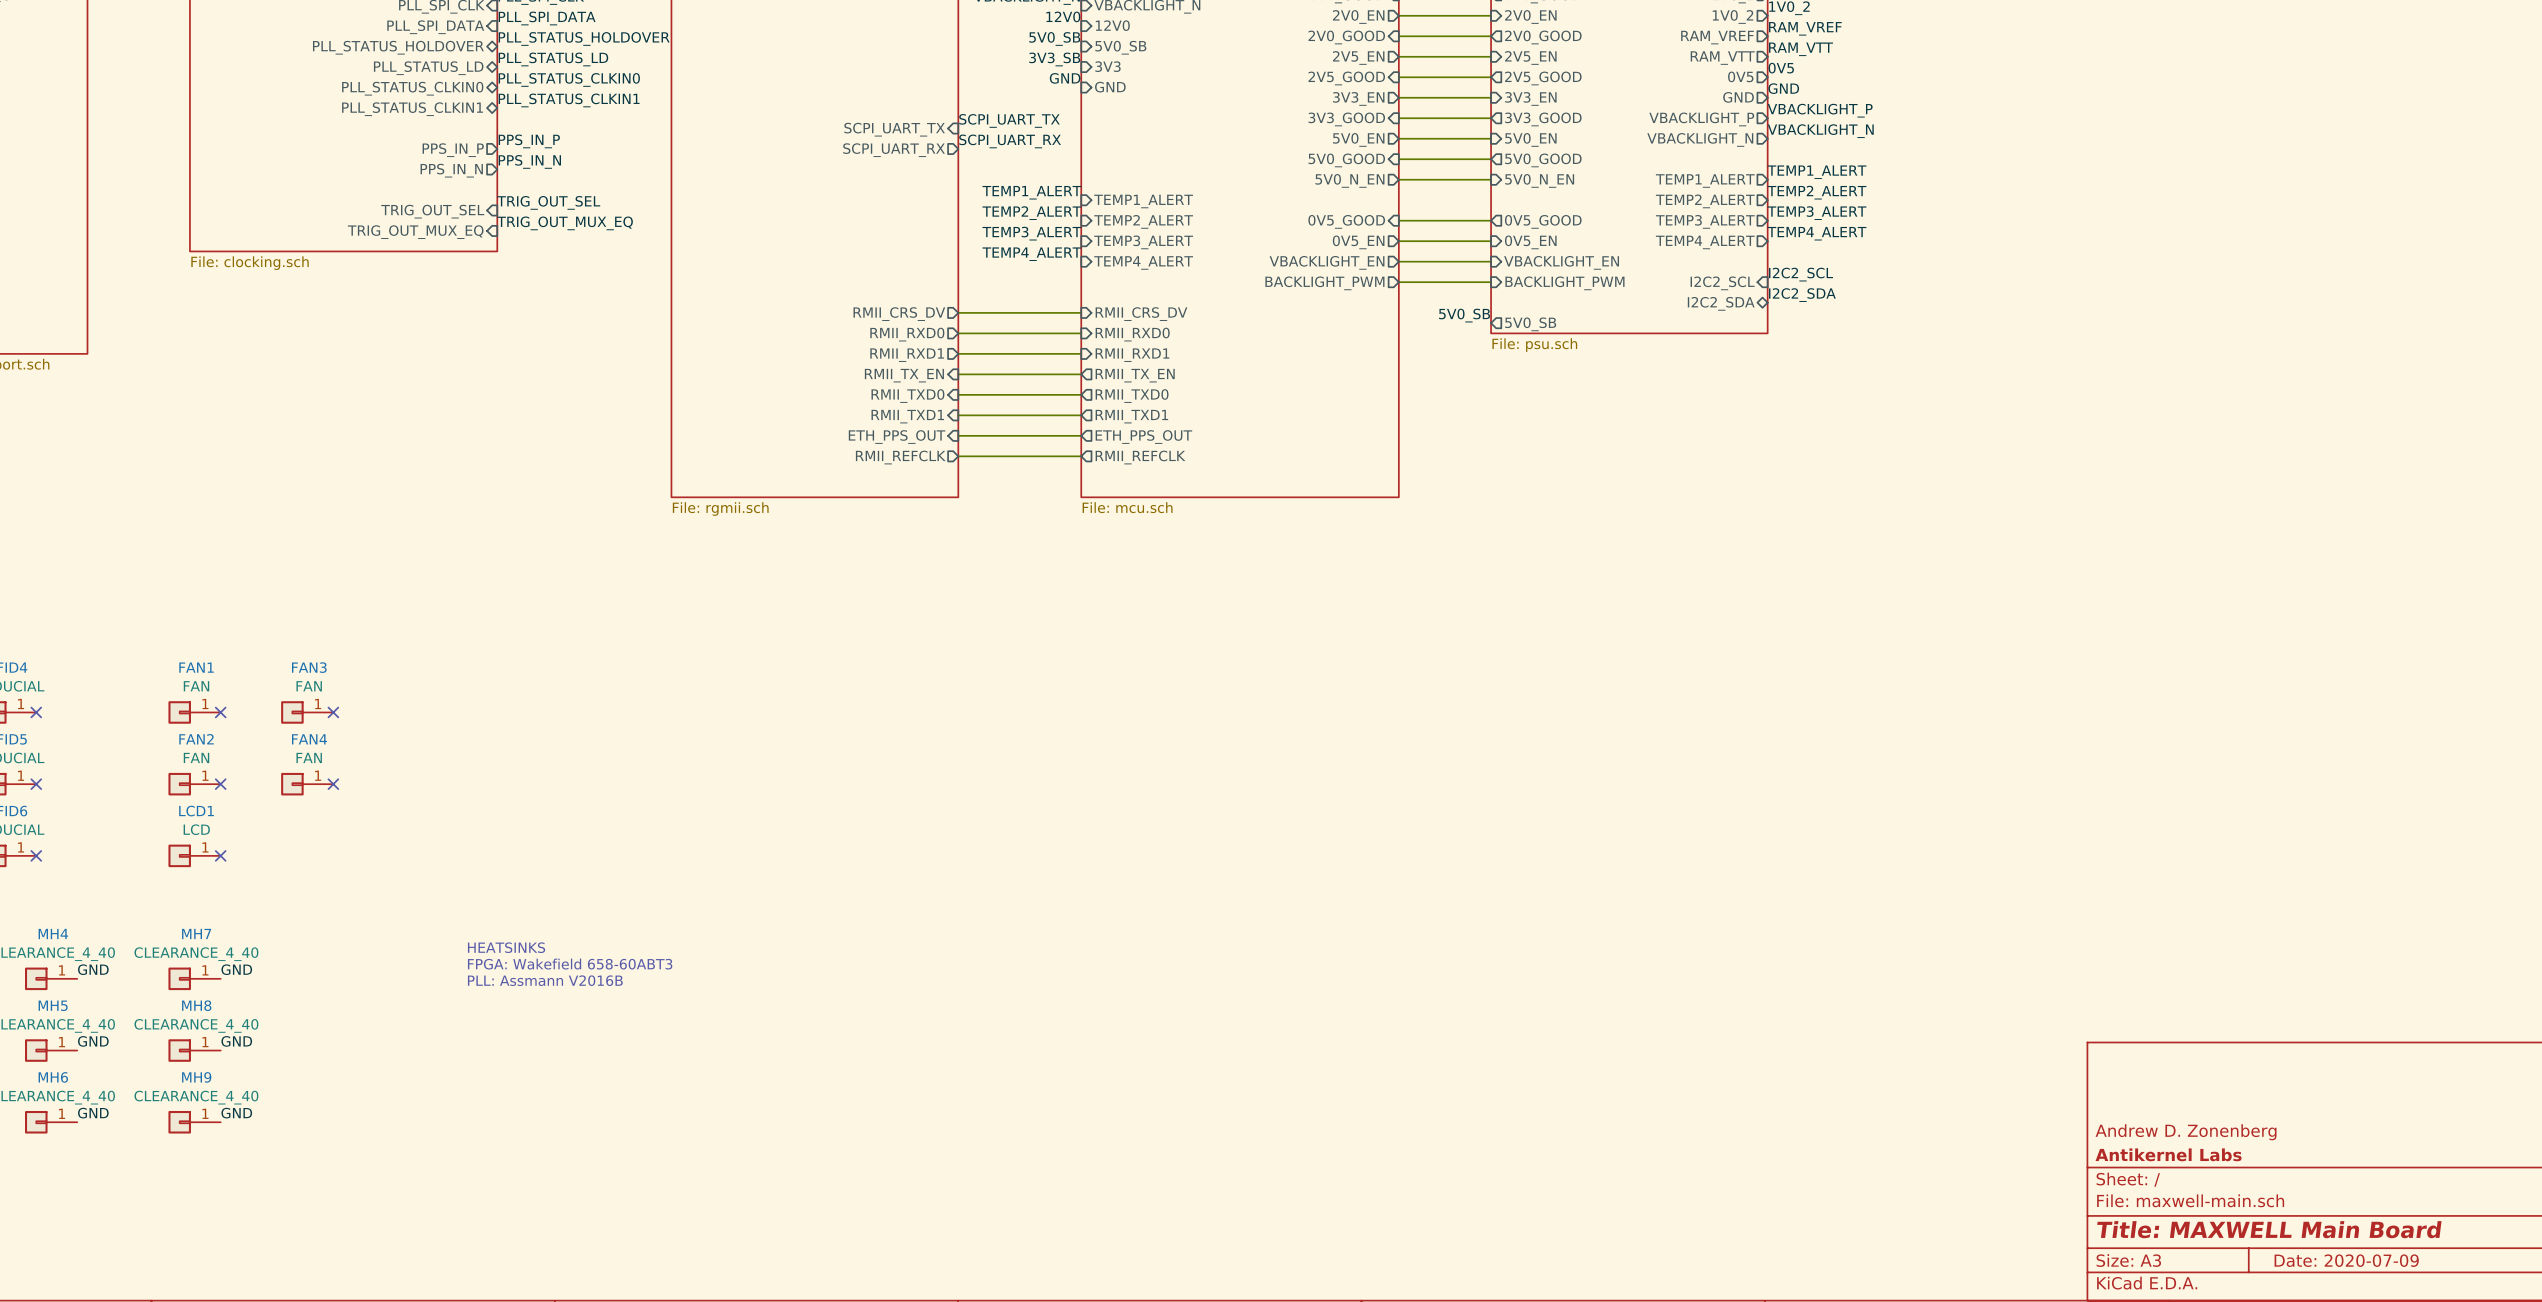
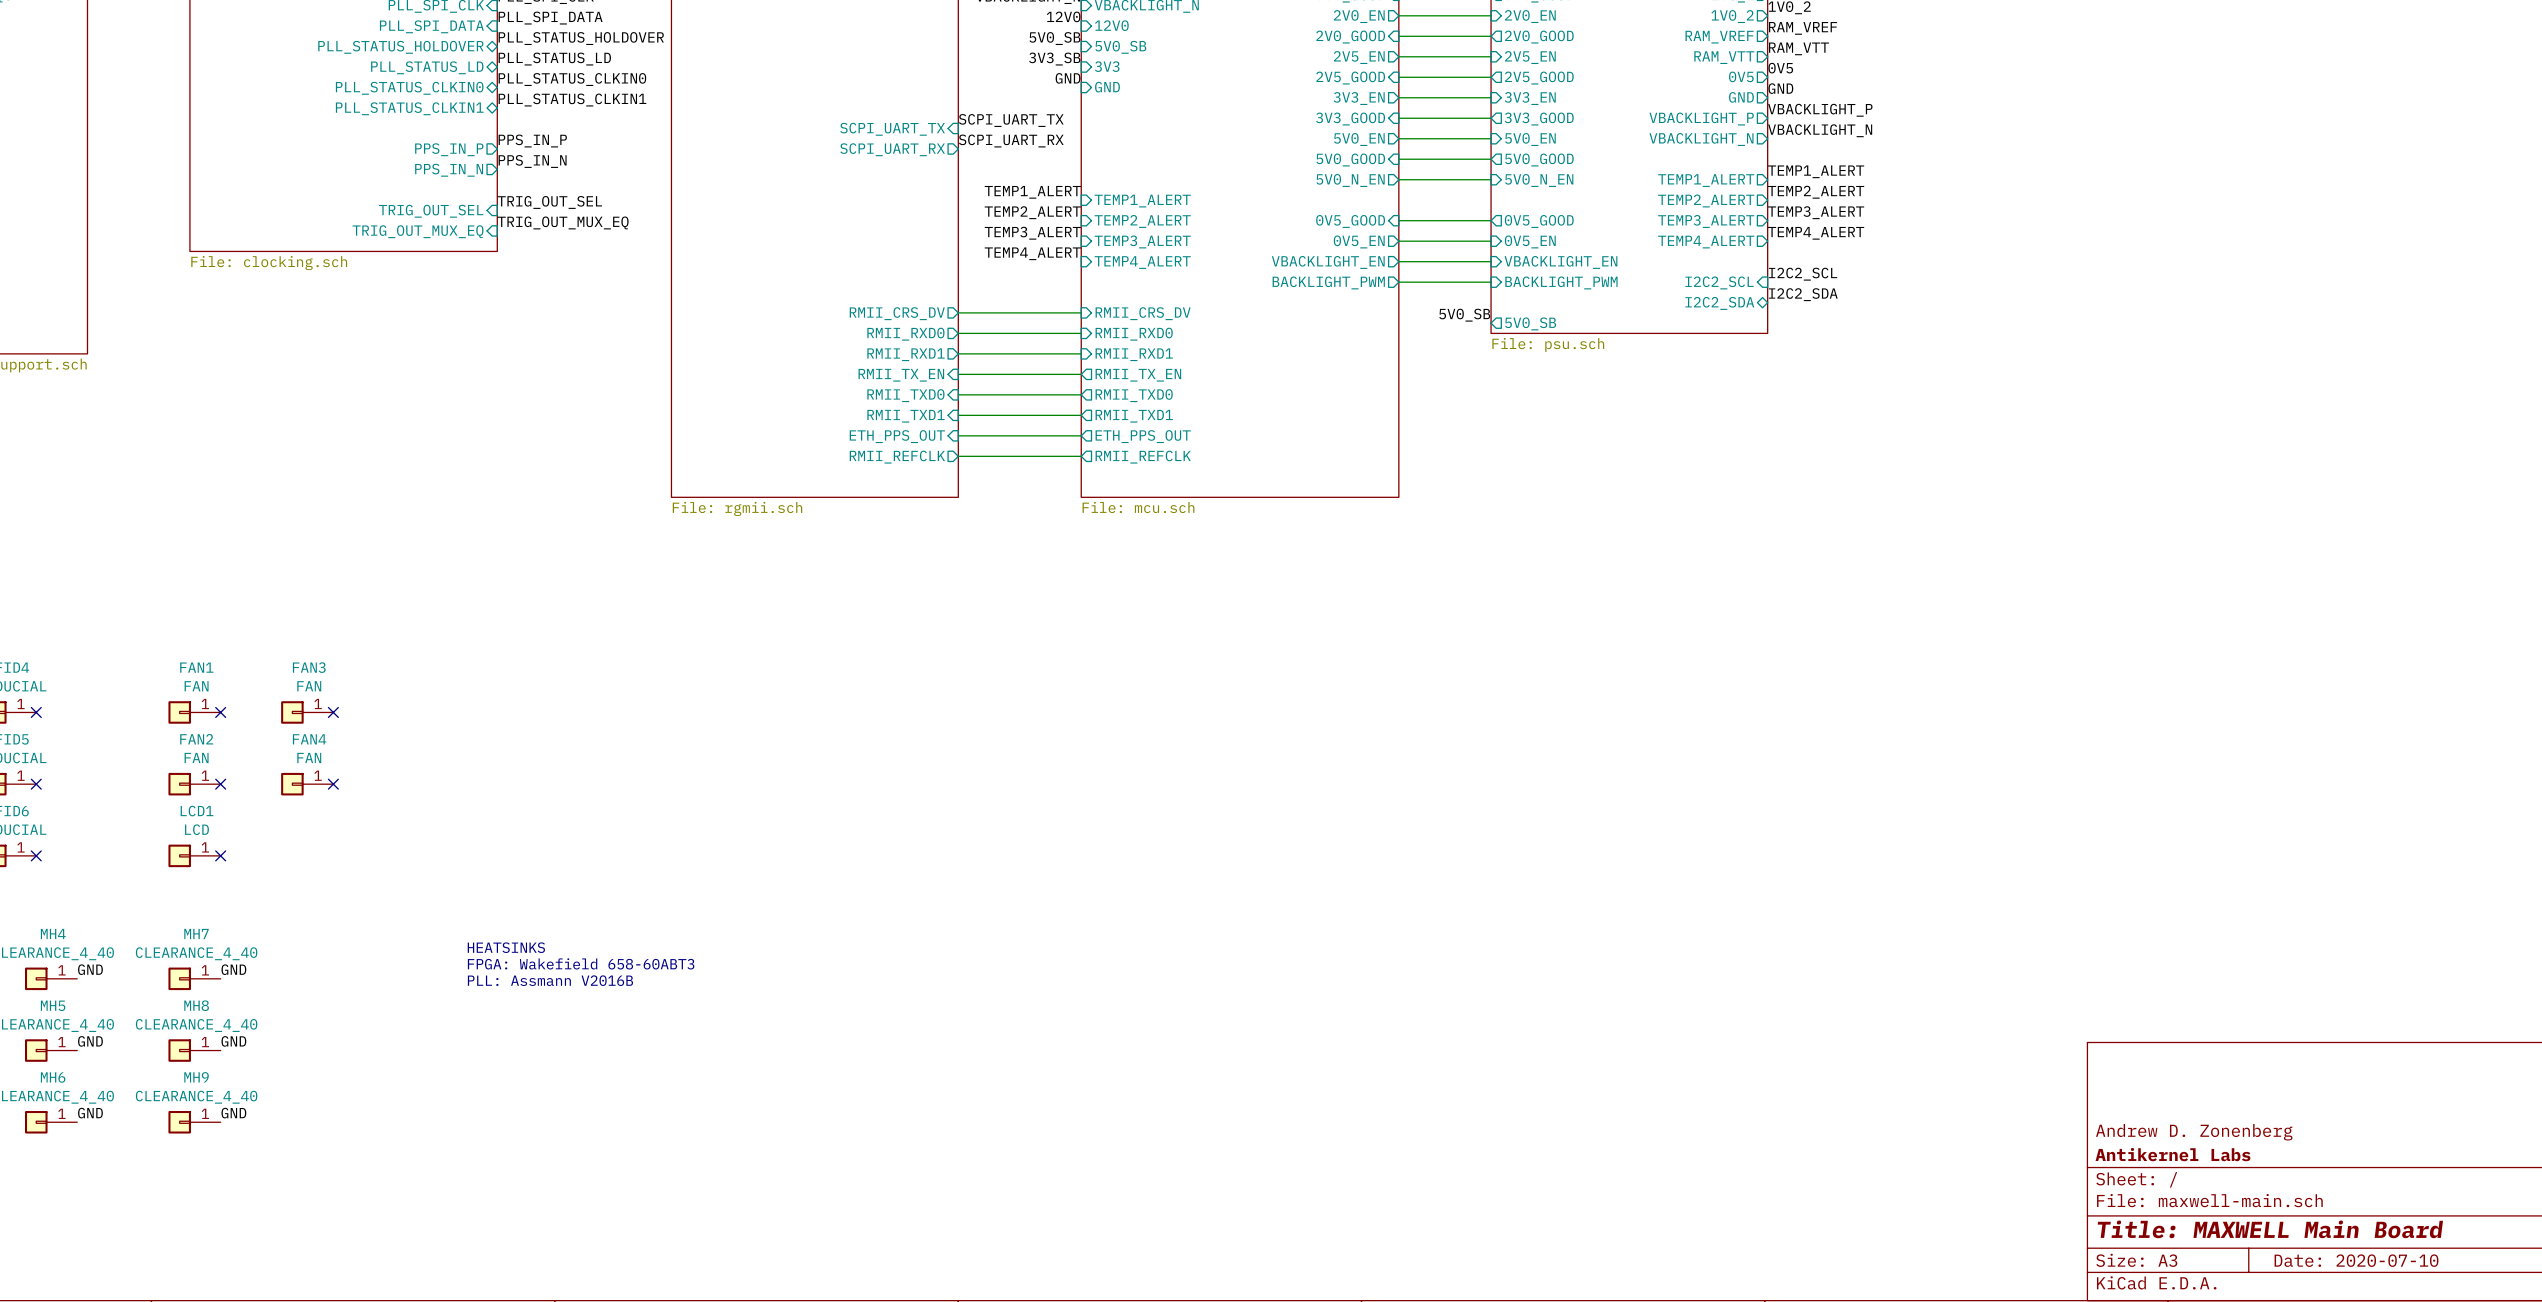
title block: Date: 2020-07-09 (2346, 1260) -> Date: 2020-07-10 (2356, 1260)

